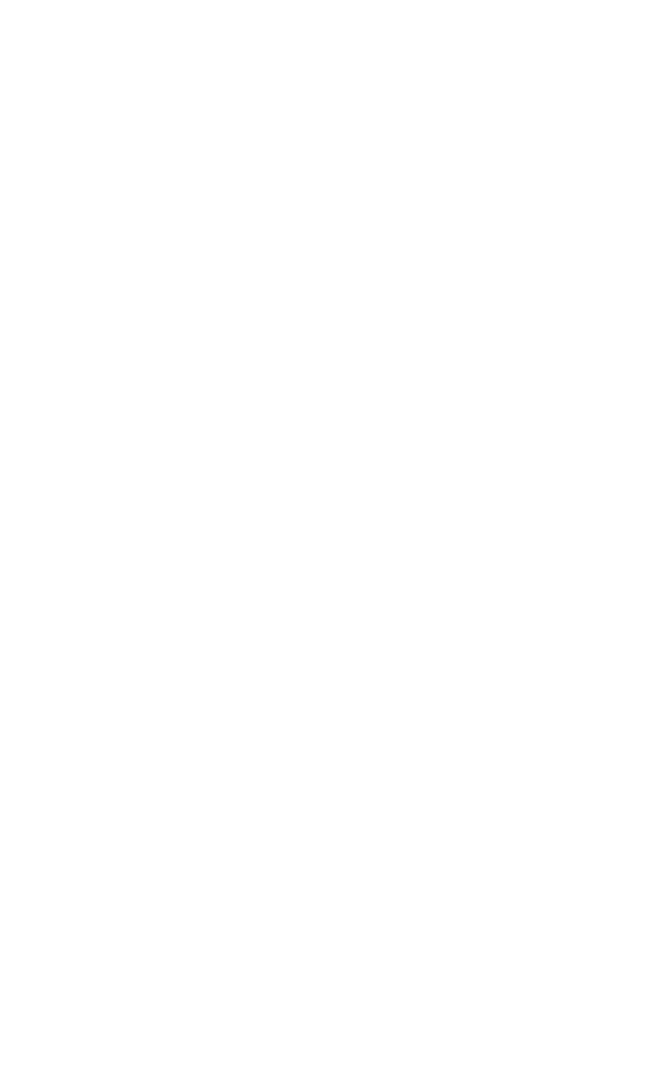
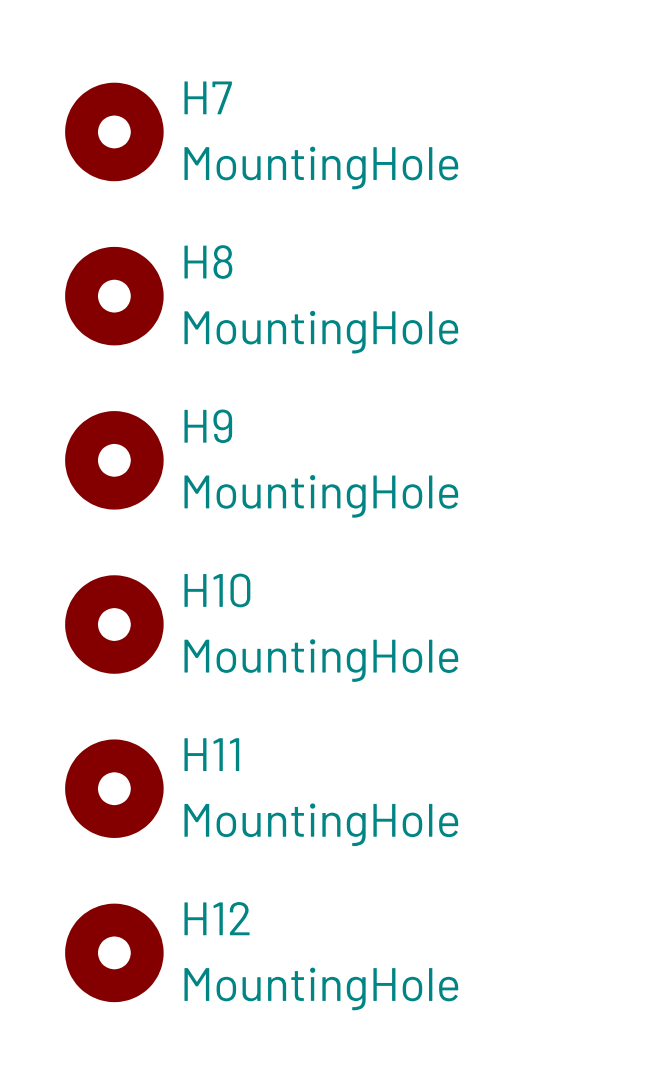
H7: none -> MountingHole (114, 131)
H8: none -> MountingHole (114, 296)
H9: none -> MountingHole (114, 460)
H10: none -> MountingHole (114, 624)
H11: none -> MountingHole (114, 788)
H12: none -> MountingHole (114, 952)

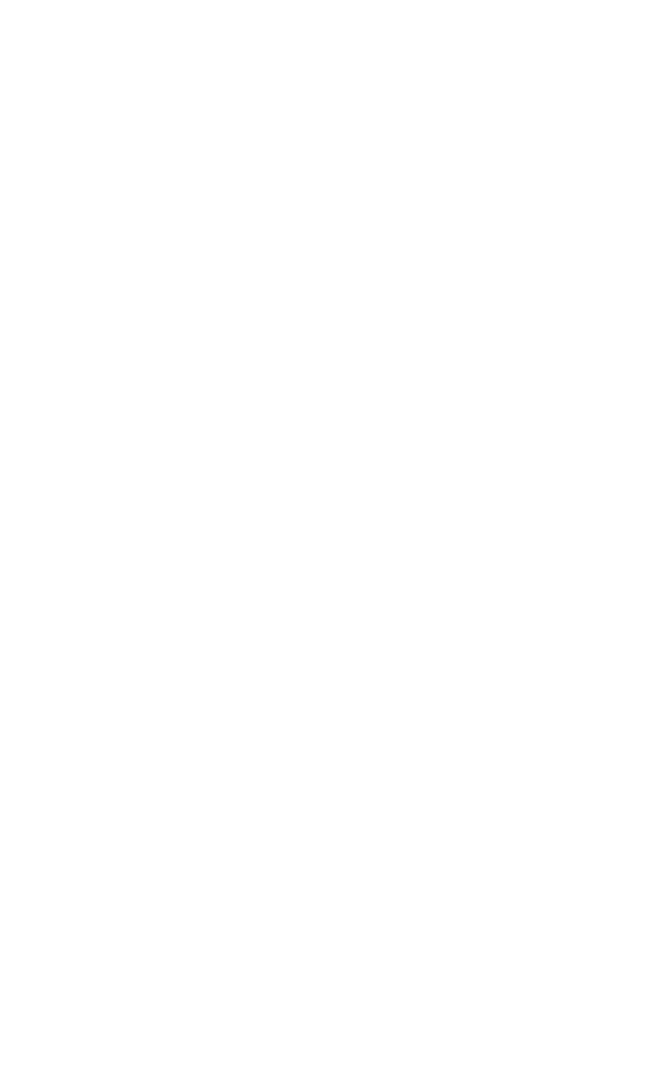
H7: MountingHole (114, 131) -> none
H8: MountingHole (114, 296) -> none
H9: MountingHole (114, 460) -> none
H10: MountingHole (114, 624) -> none
H11: MountingHole (114, 788) -> none
H12: MountingHole (114, 952) -> none

